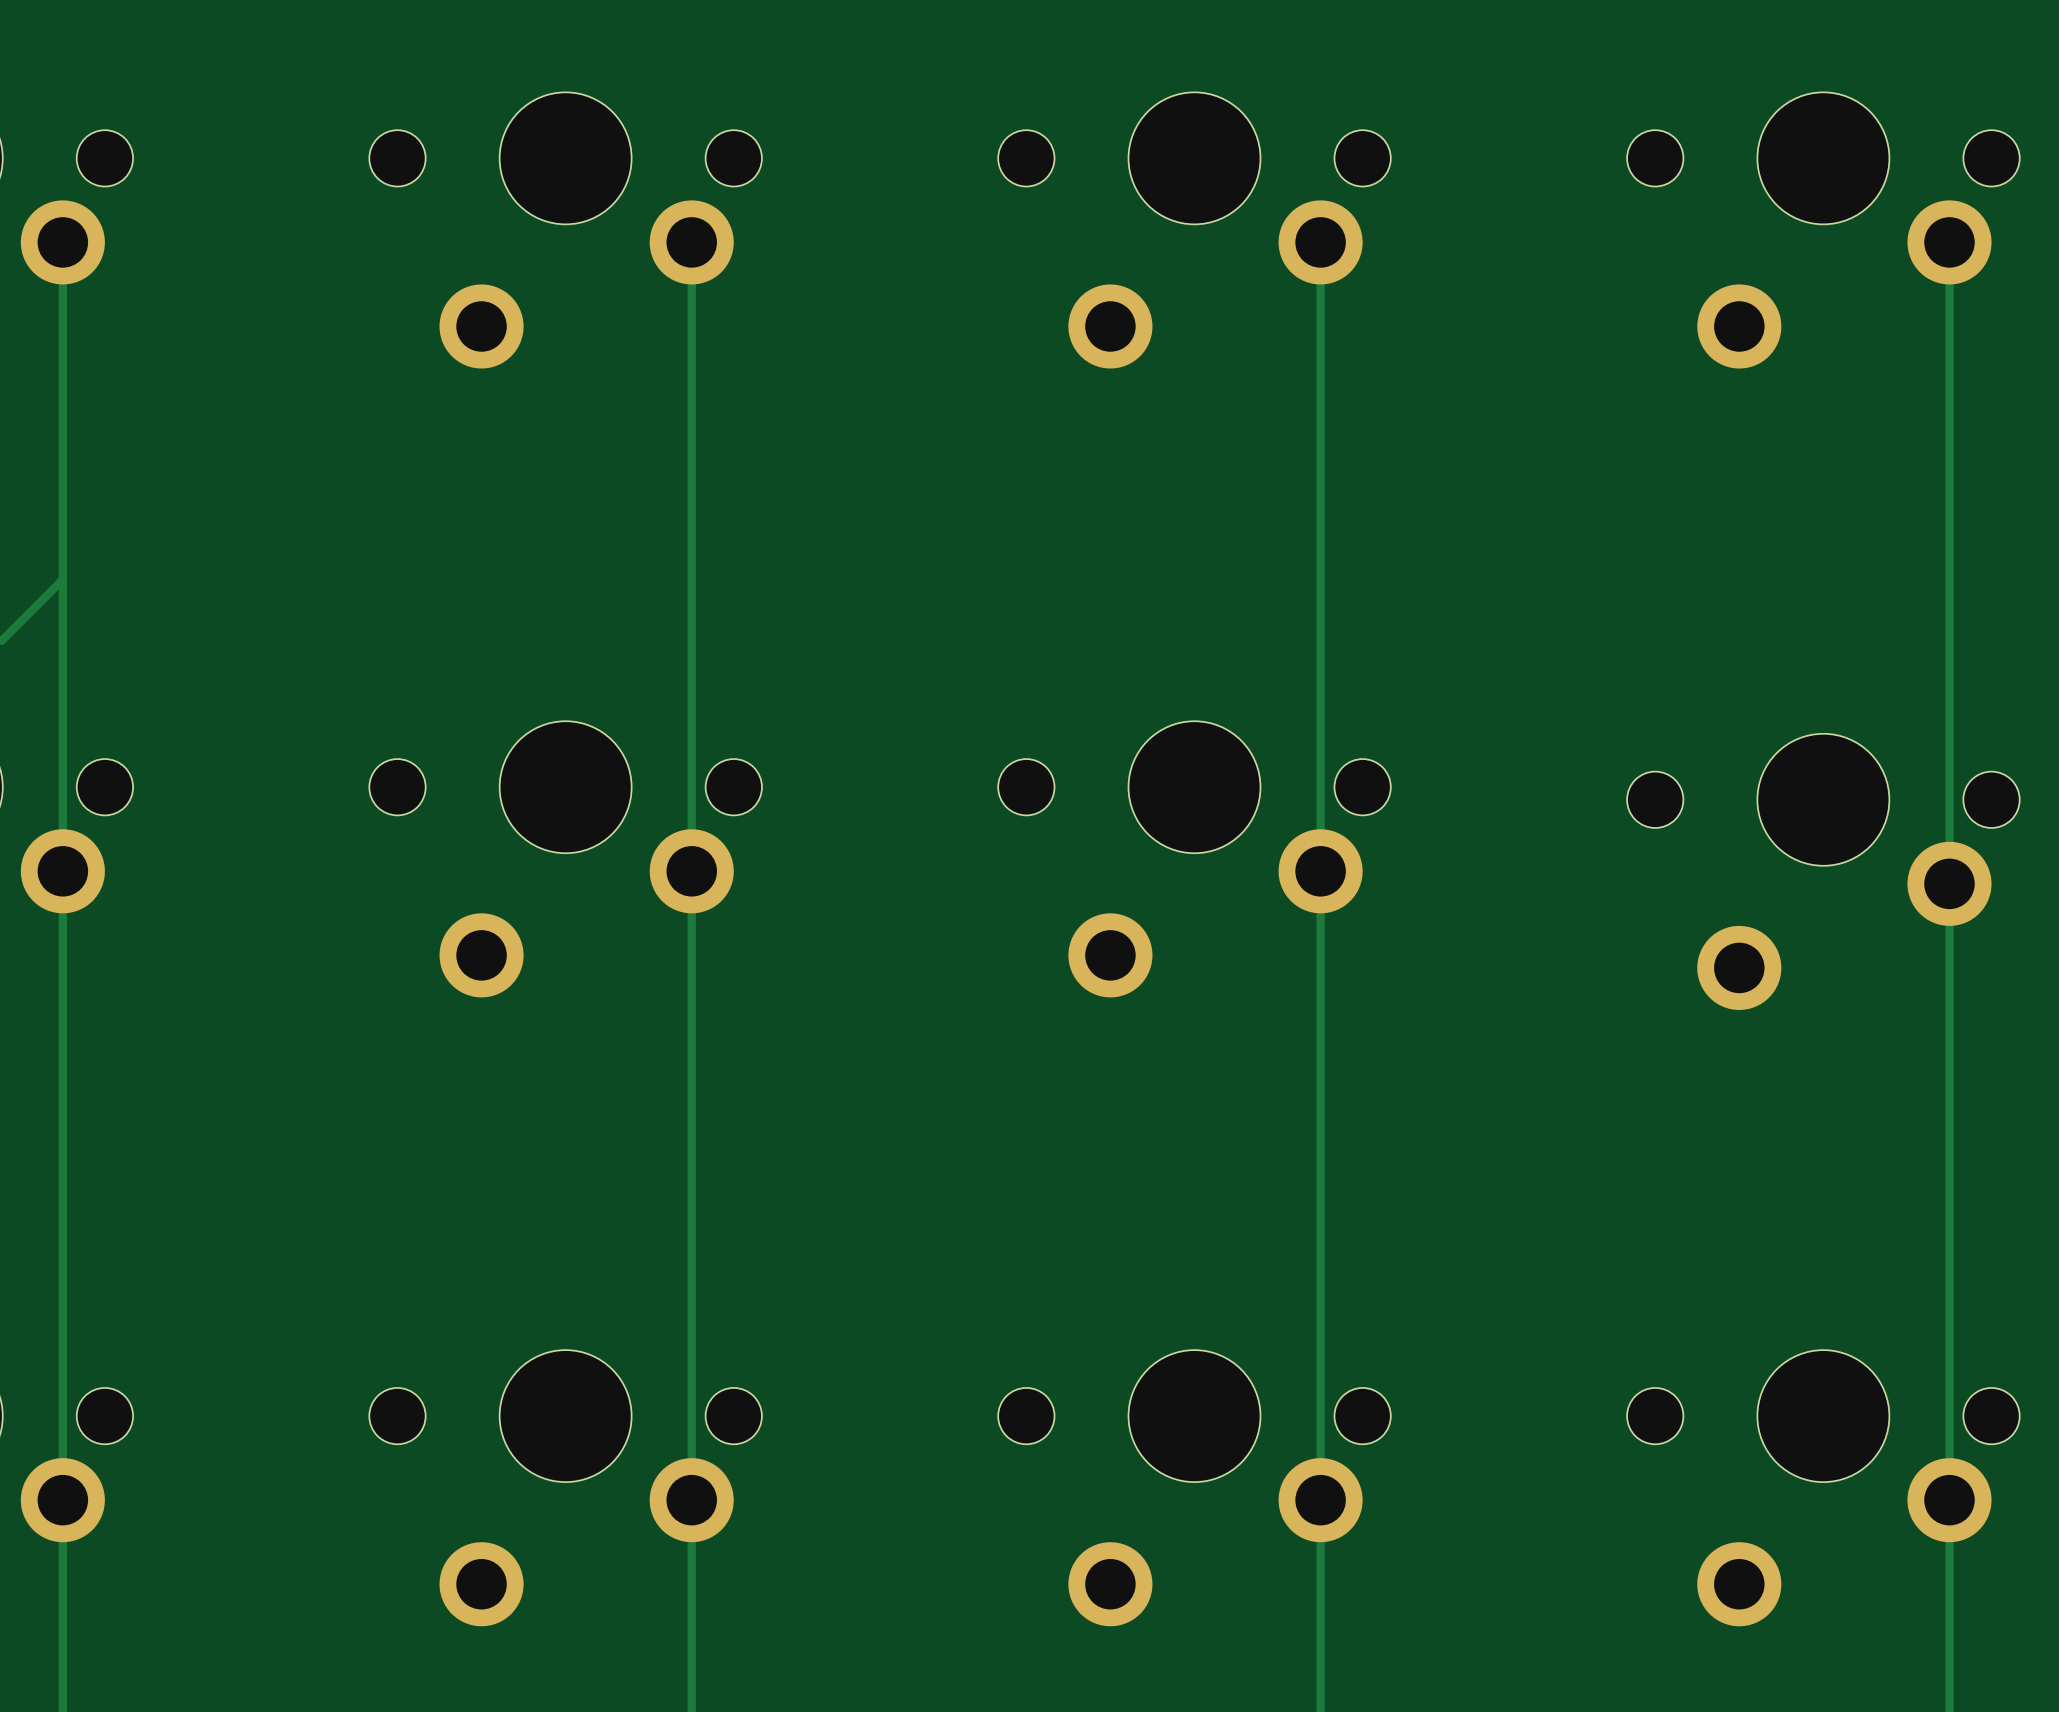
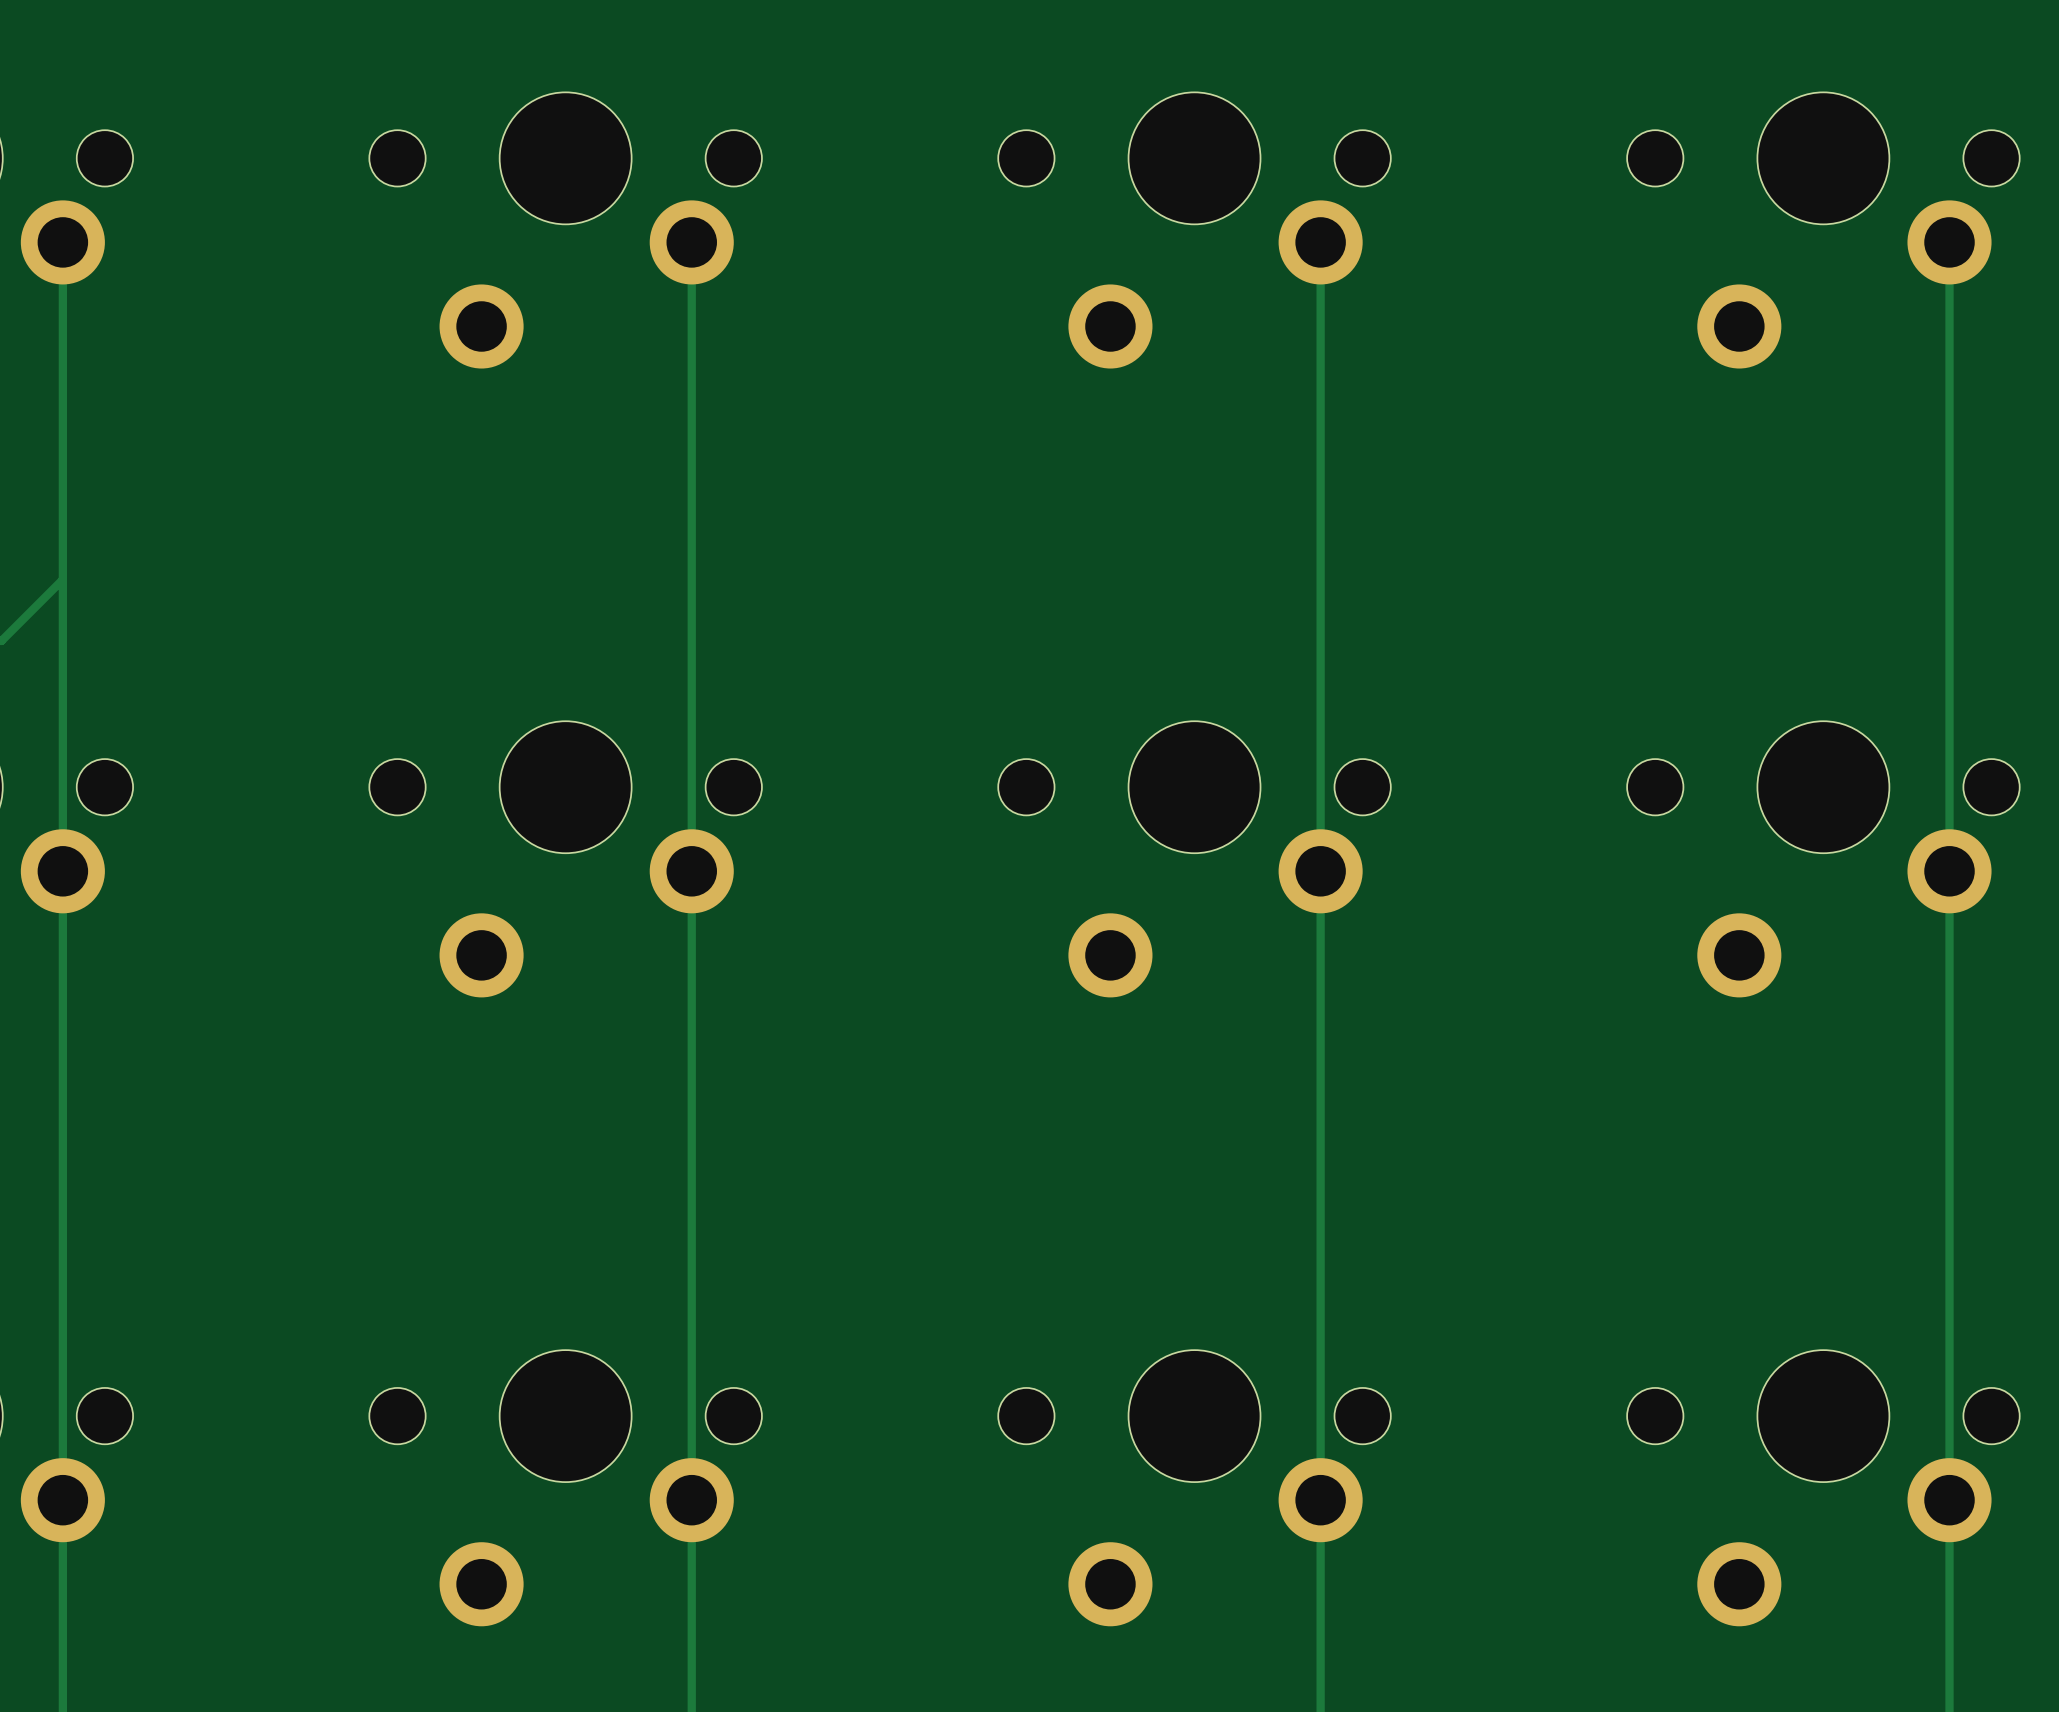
part position: (1823, 871) -> (1823, 859)

